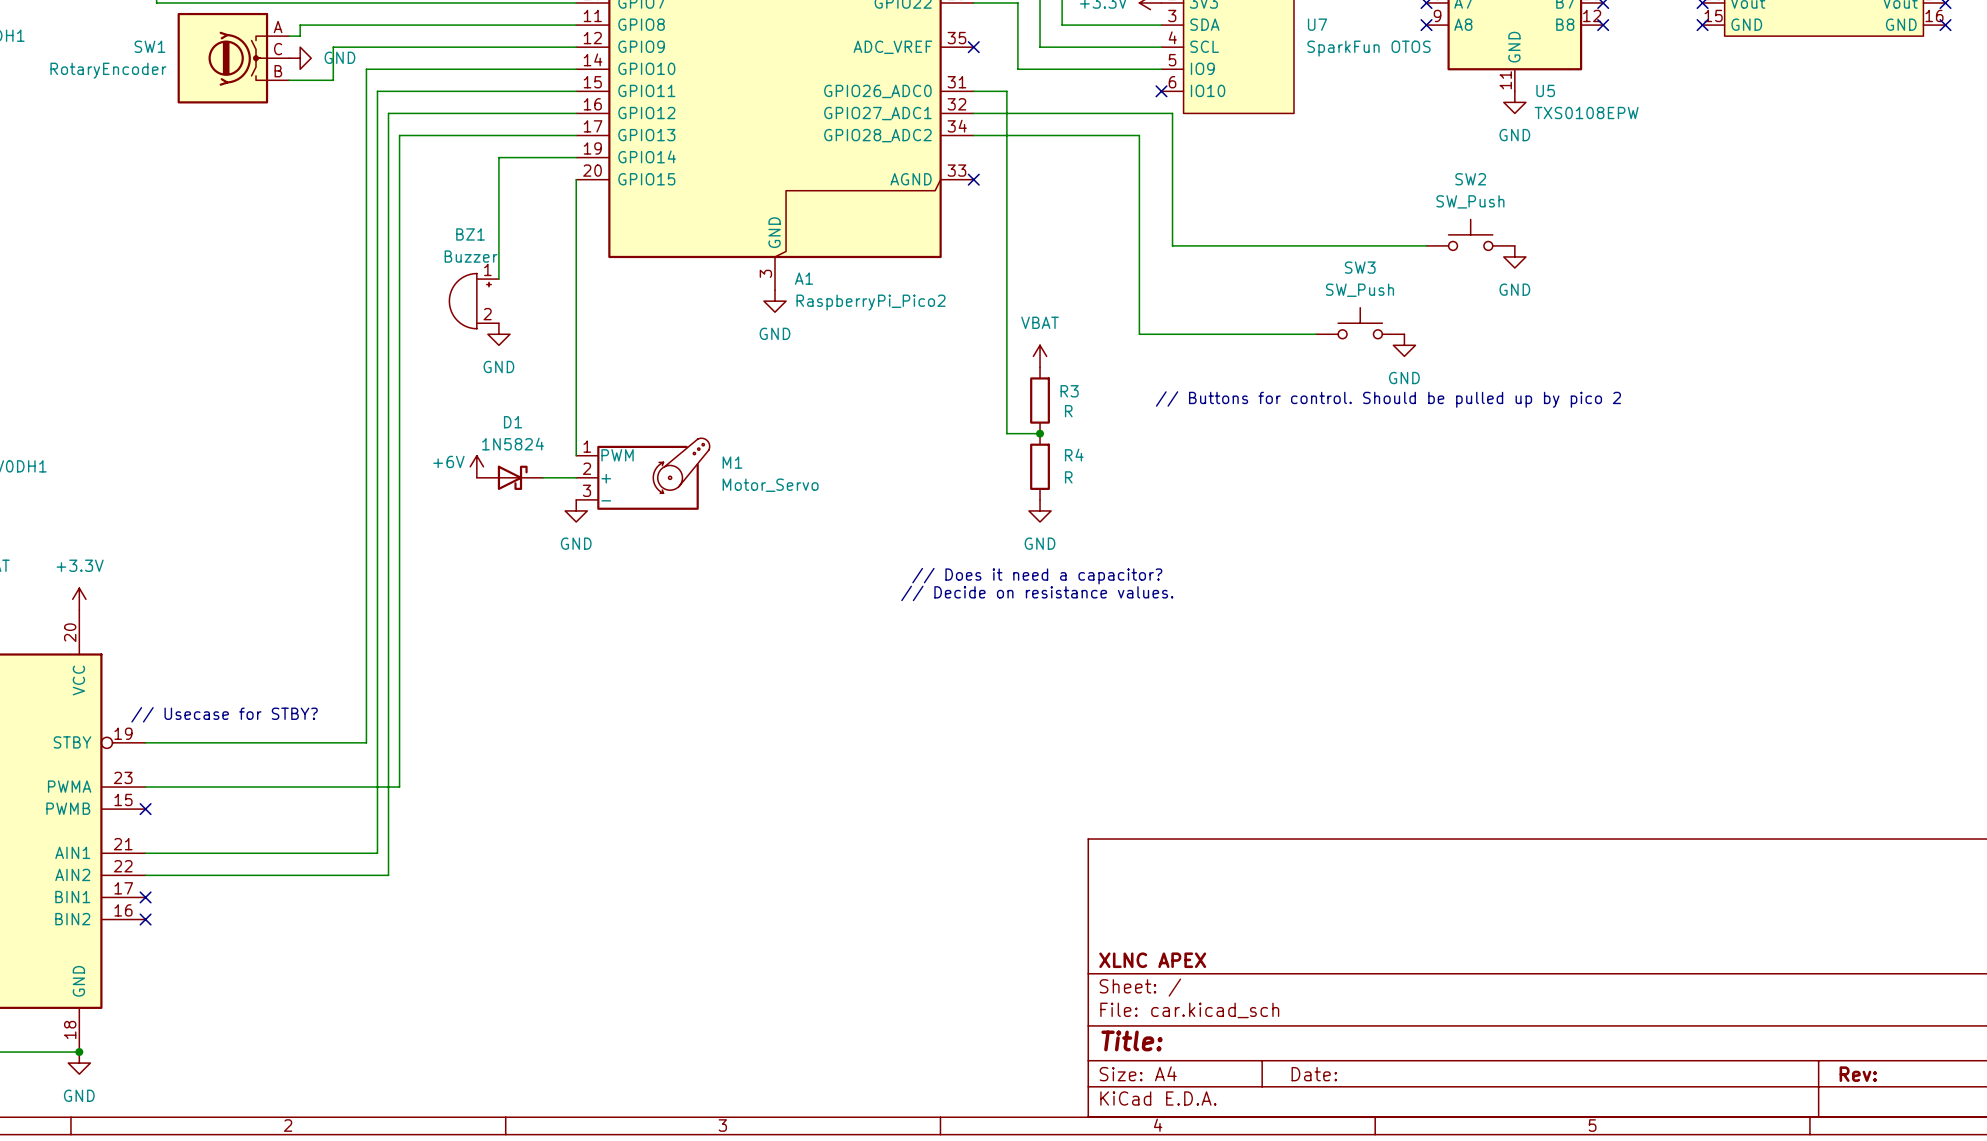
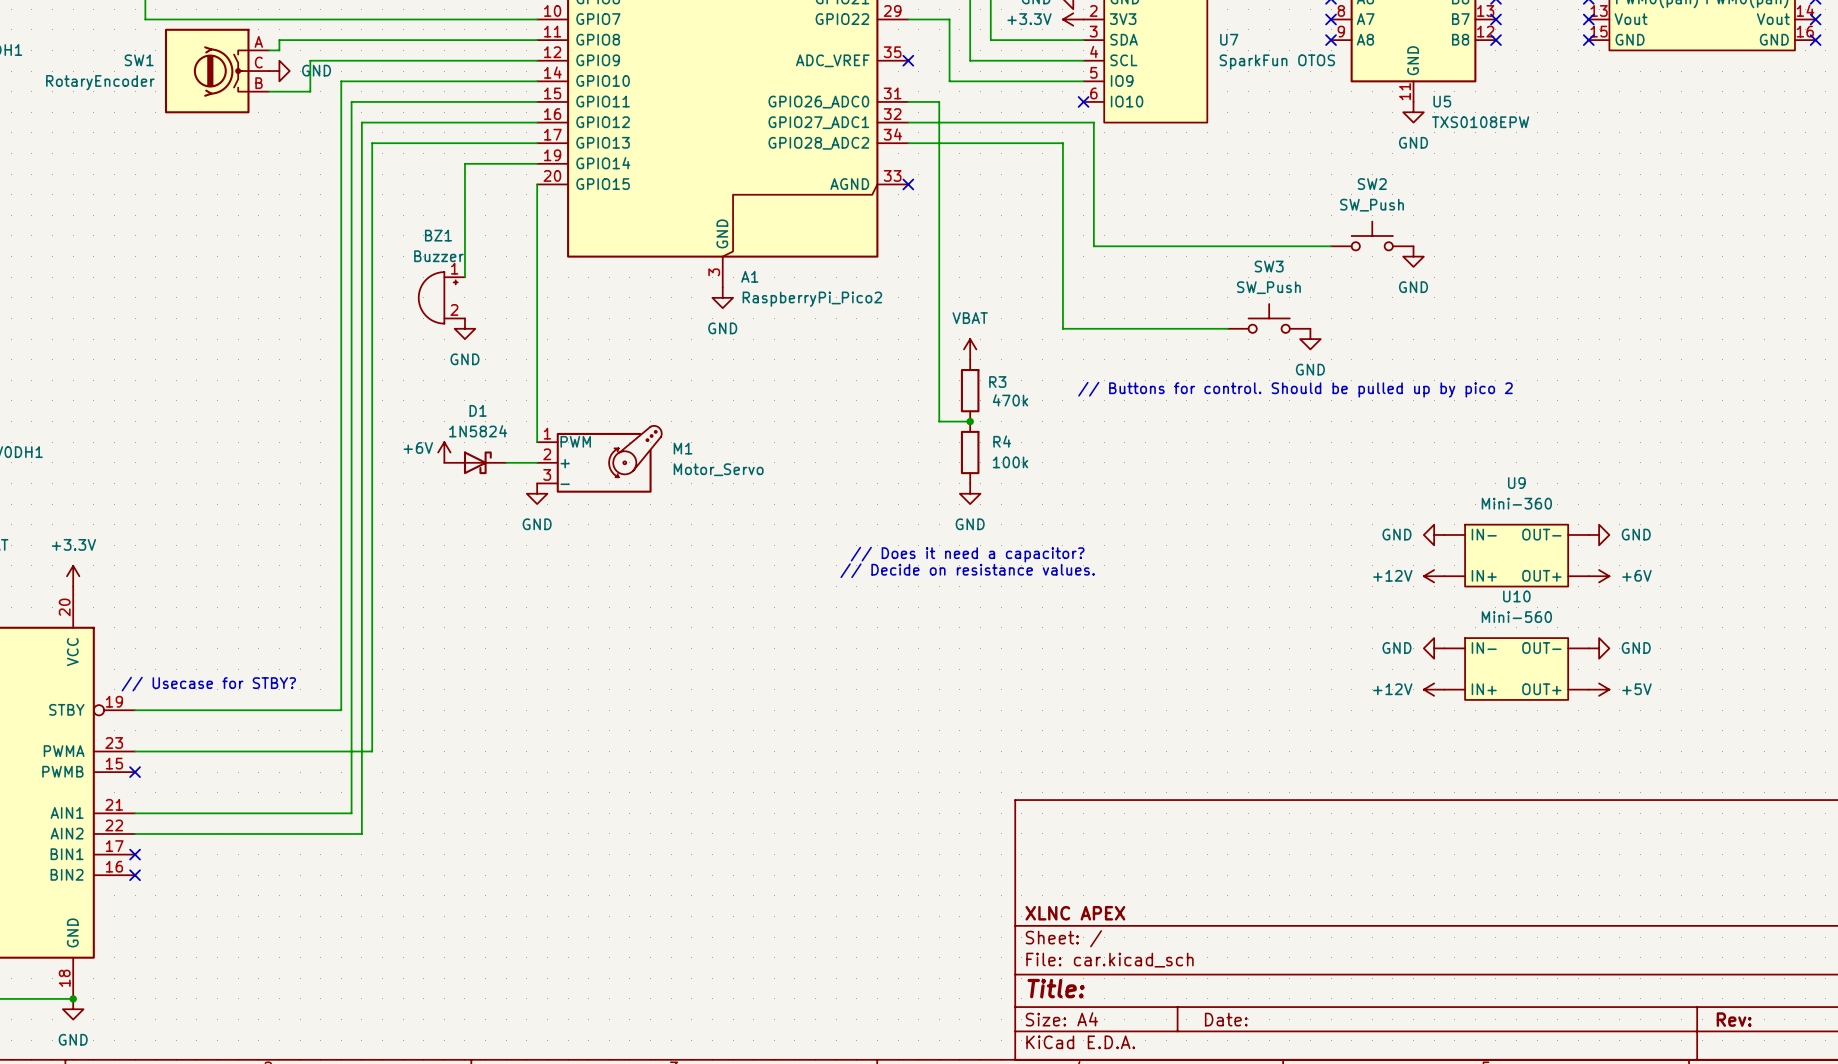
R3 value: R (1068, 411) -> 470k (1010, 400)
R4 value: R (1068, 477) -> 100k (1010, 462)
power symbol: none -> GND (1434, 534)
power symbol: none -> GND (1599, 534)
U9: none -> Mini-360 (1516, 555)
power symbol: none -> +12V (1434, 576)
power symbol: none -> +6V (1599, 576)
power symbol: none -> GND (1434, 648)
power symbol: none -> GND (1599, 648)
U10: none -> Mini-560 (1516, 669)
power symbol: none -> +12V (1434, 689)
power symbol: none -> +5V (1599, 689)

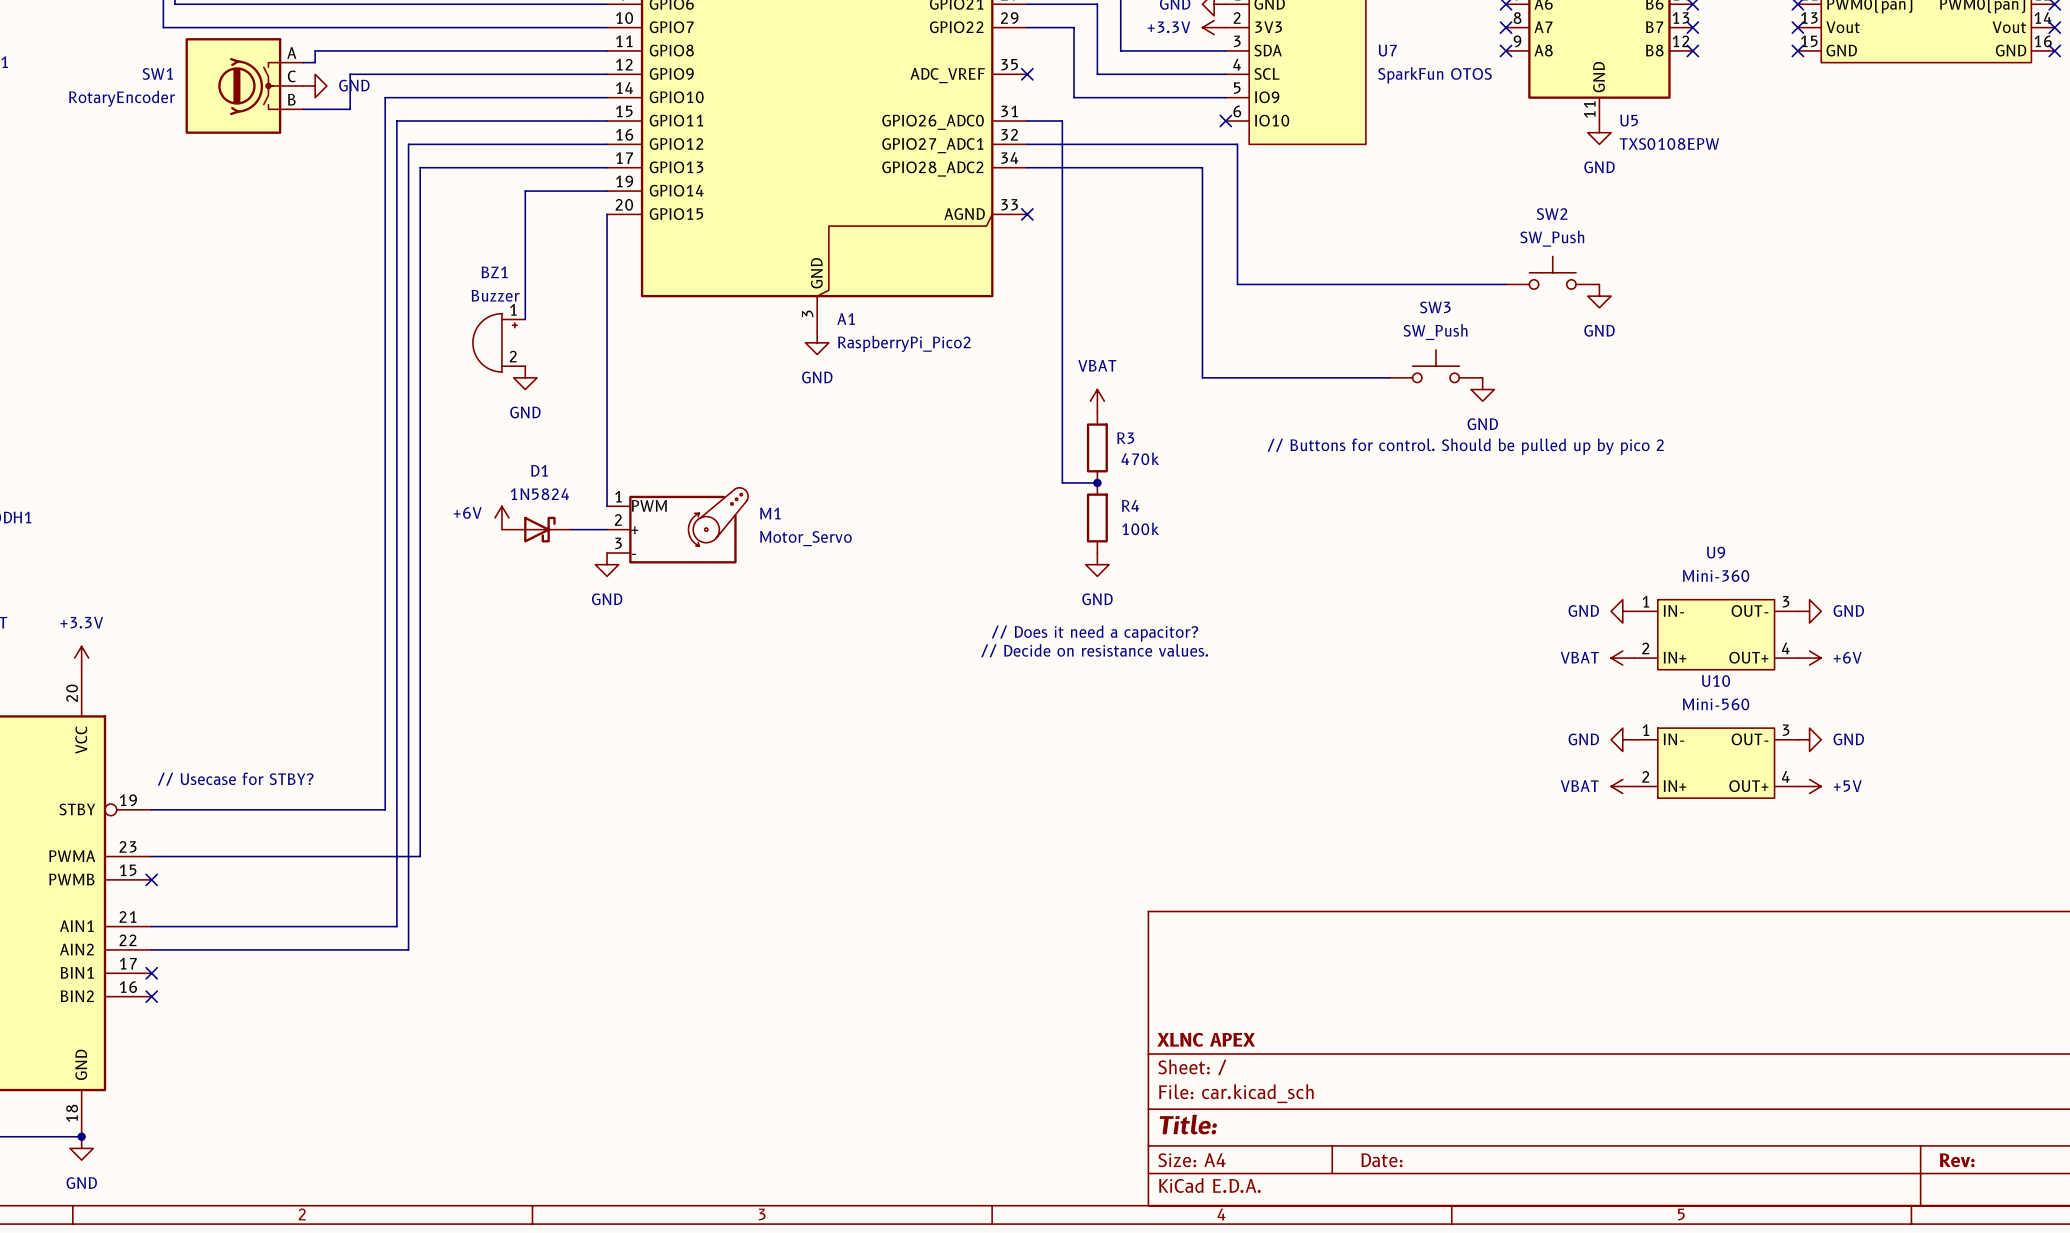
U9 pin number: none -> 1 (1645, 601)
U9 pin number: none -> 3 (1786, 601)
U9 pin number: none -> 2 (1645, 648)
U9 pin number: none -> 4 (1785, 648)
power symbol: +12V (1434, 576) -> VBAT (1622, 658)
U10 pin number: none -> 1 (1645, 730)
U10 pin number: none -> 3 (1786, 730)
U10 pin number: none -> 4 (1785, 776)
U10 pin number: none -> 2 (1645, 776)
power symbol: +12V (1434, 689) -> VBAT (1622, 786)

